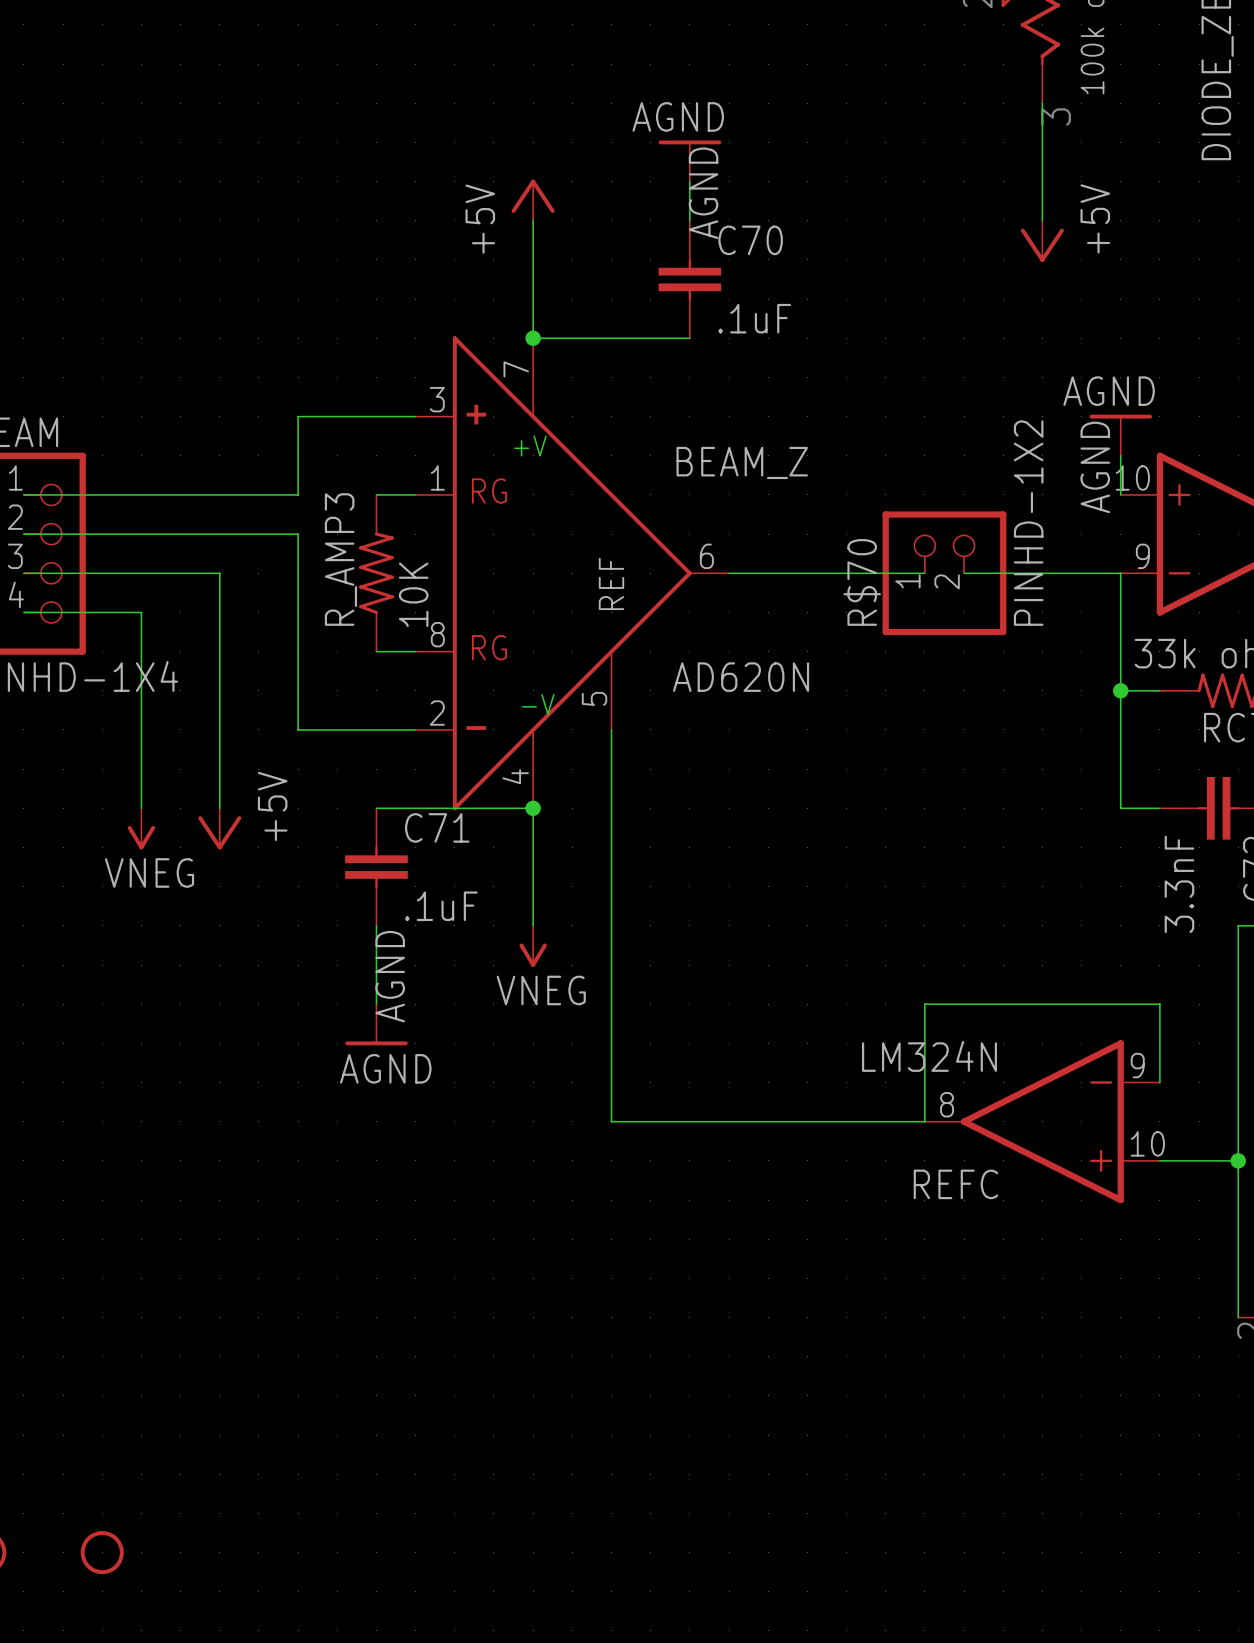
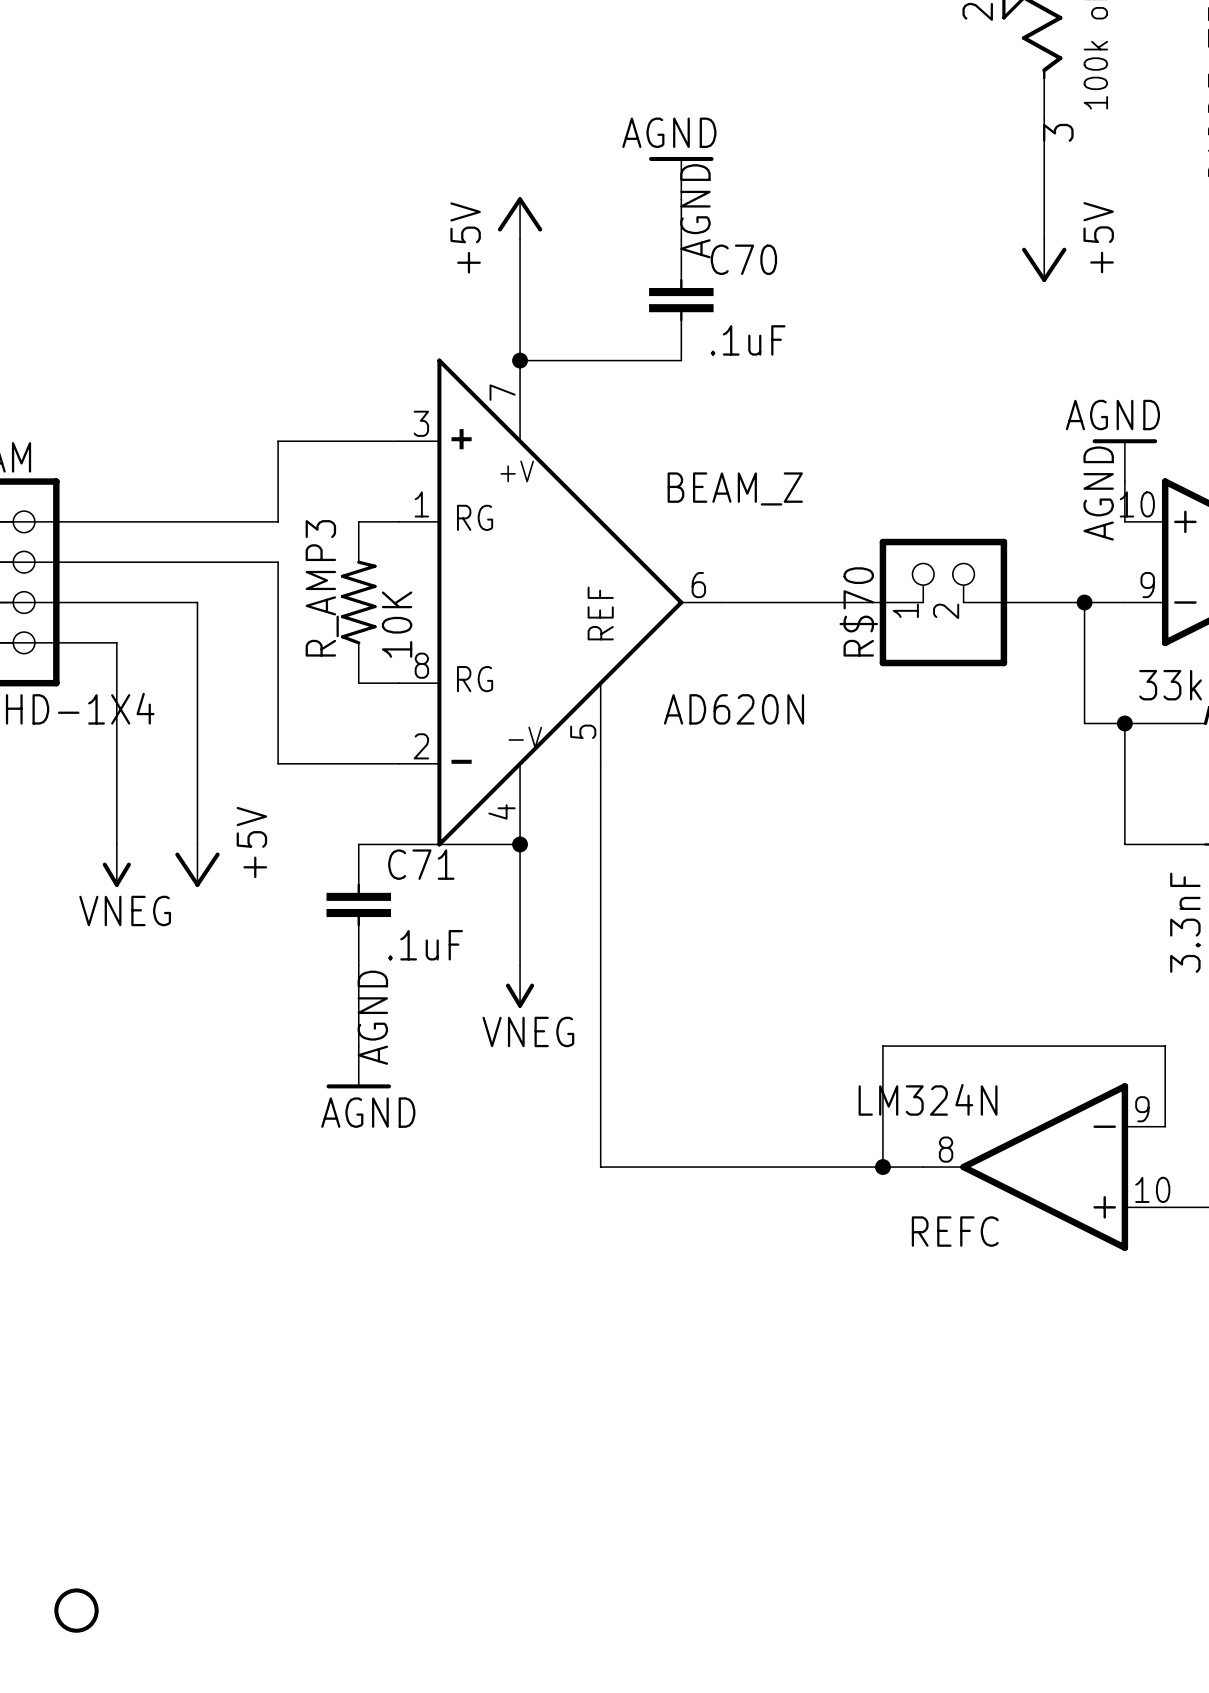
R$70 value: PINHD-1X2 (1028, 523) -> none
junction: none -> (1084, 602)
wire: (1120, 573) (1120, 690) -> (1084, 602) (1084, 723) (1124, 723)
wire: (924, 1004) (924, 1121) -> (923, 1046) (882, 1046) (882, 1167)
junction: none -> (882, 1167)

